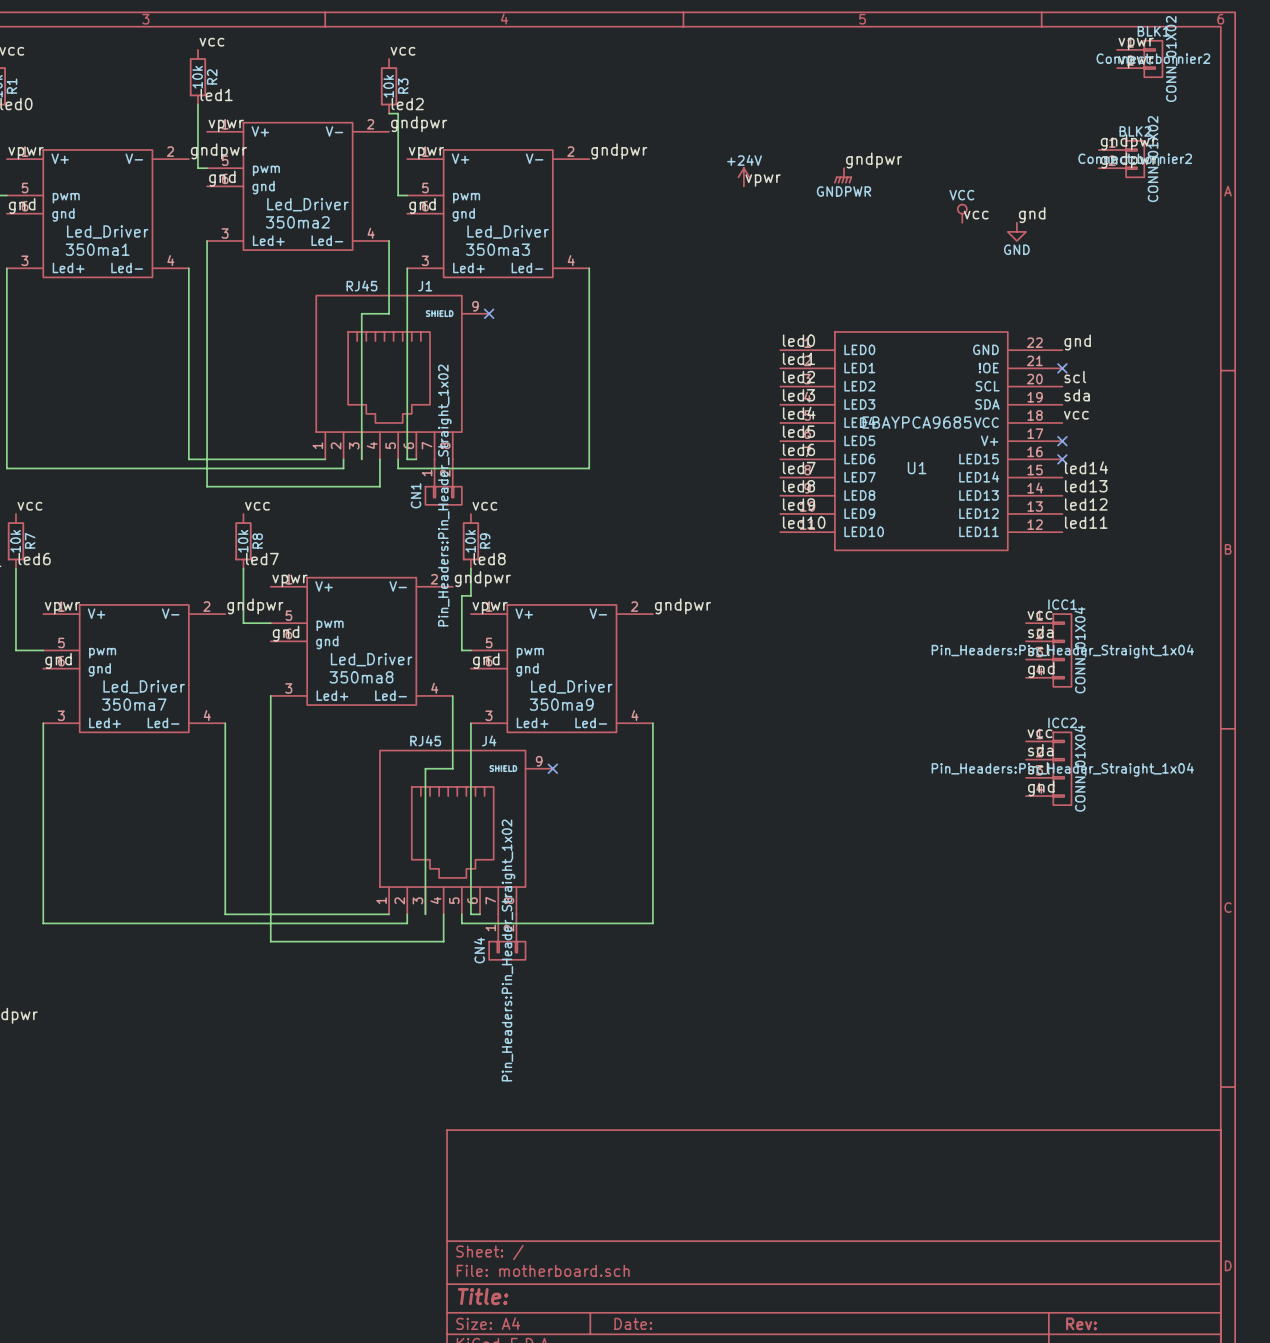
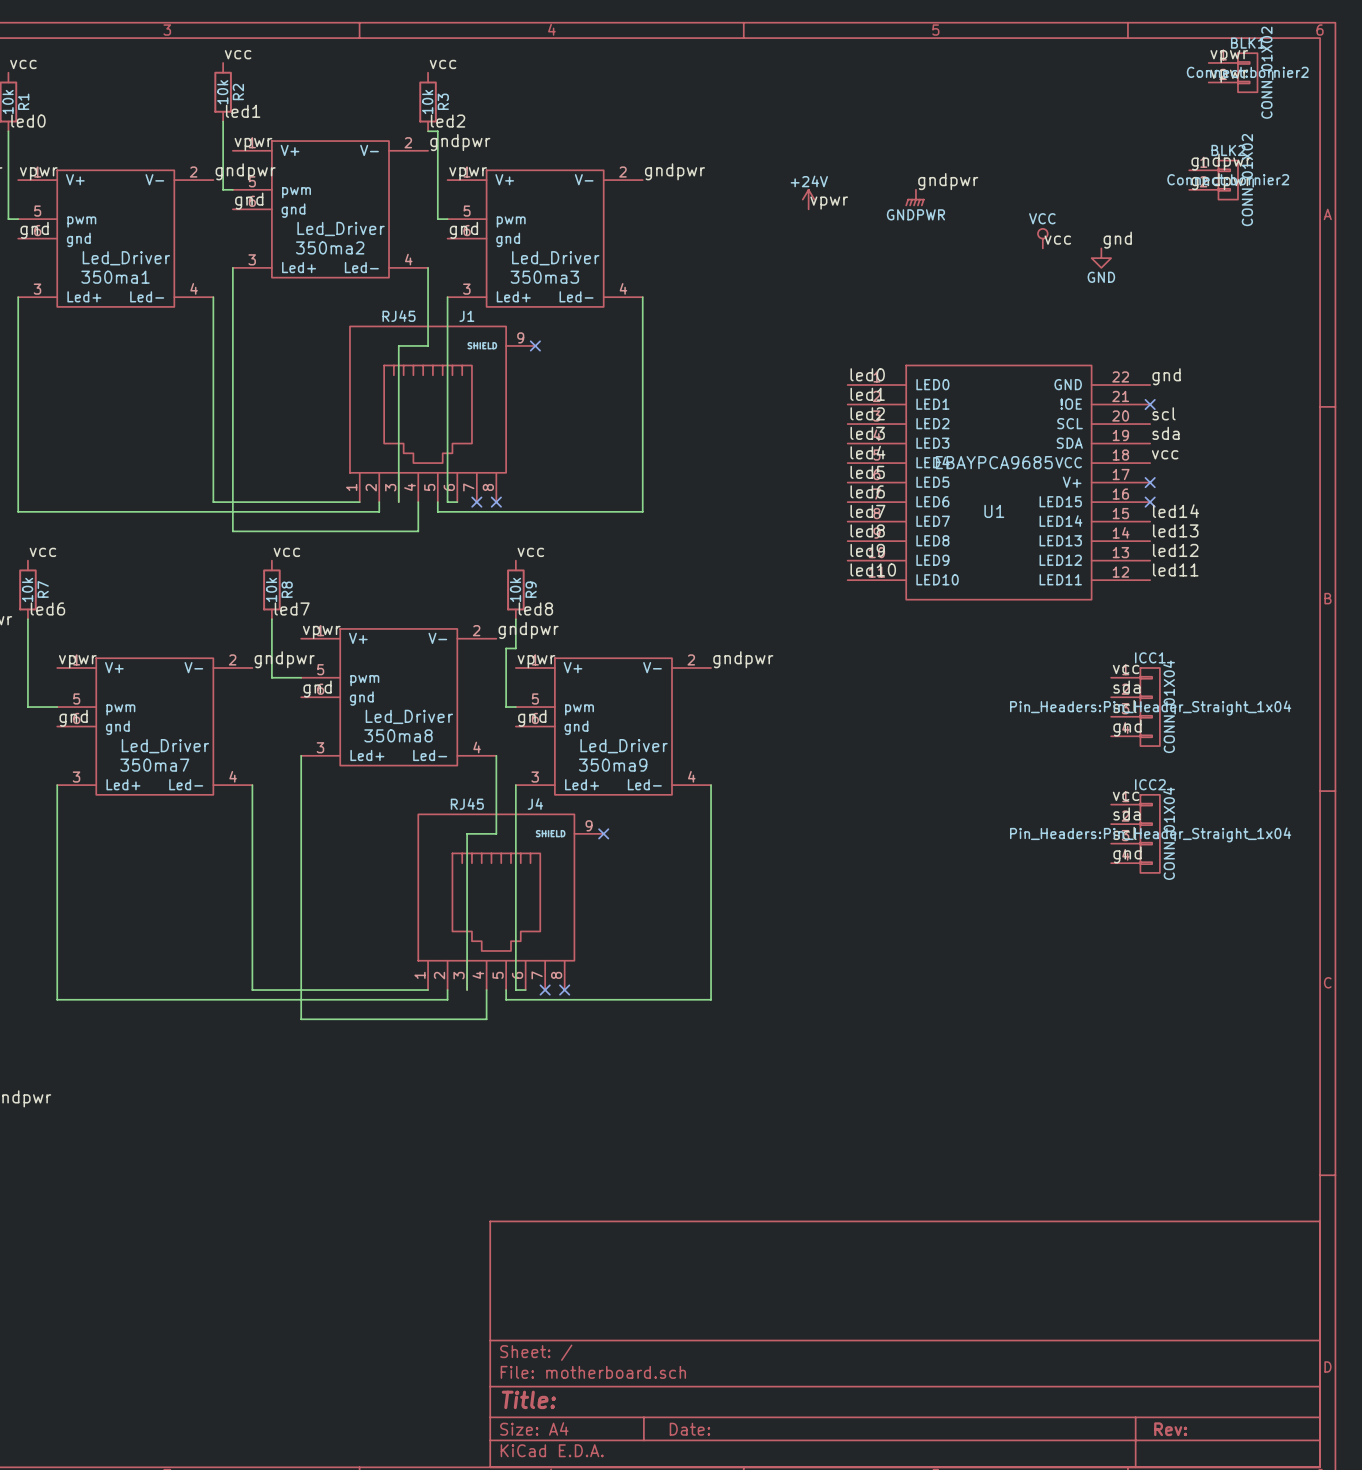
no-connect mark: none -> (476, 502)
no-connect mark: none -> (496, 502)
CN1: (443, 482) -> none
no-connect mark: none -> (545, 990)
no-connect mark: none -> (564, 990)
CN4: (507, 937) -> none

